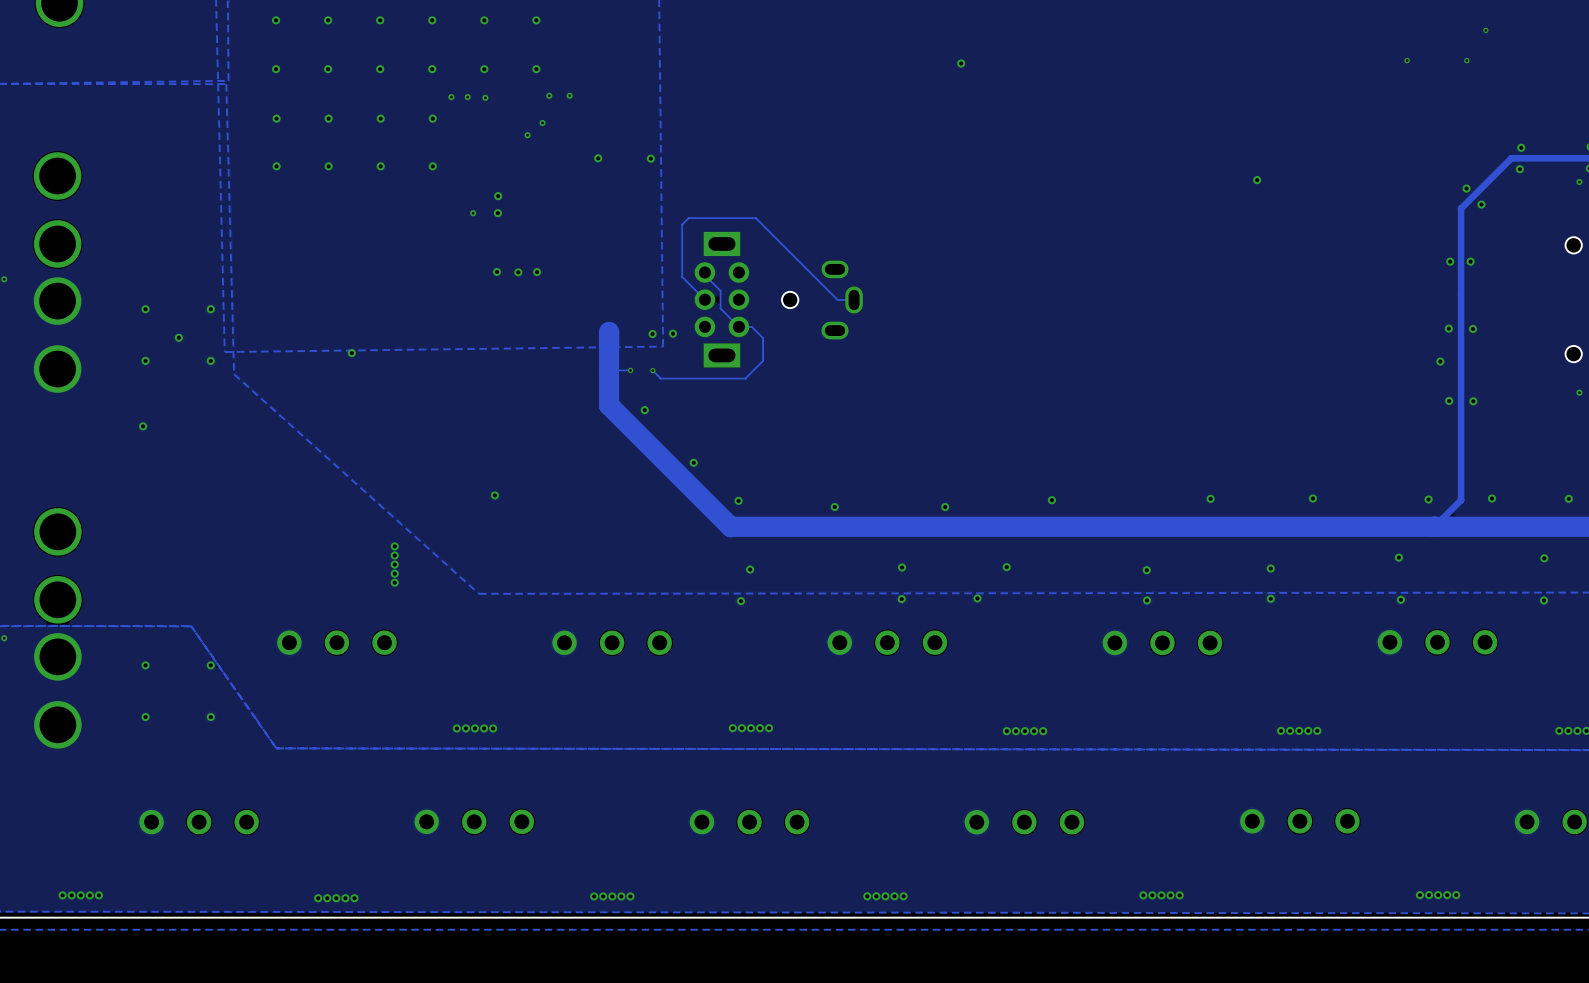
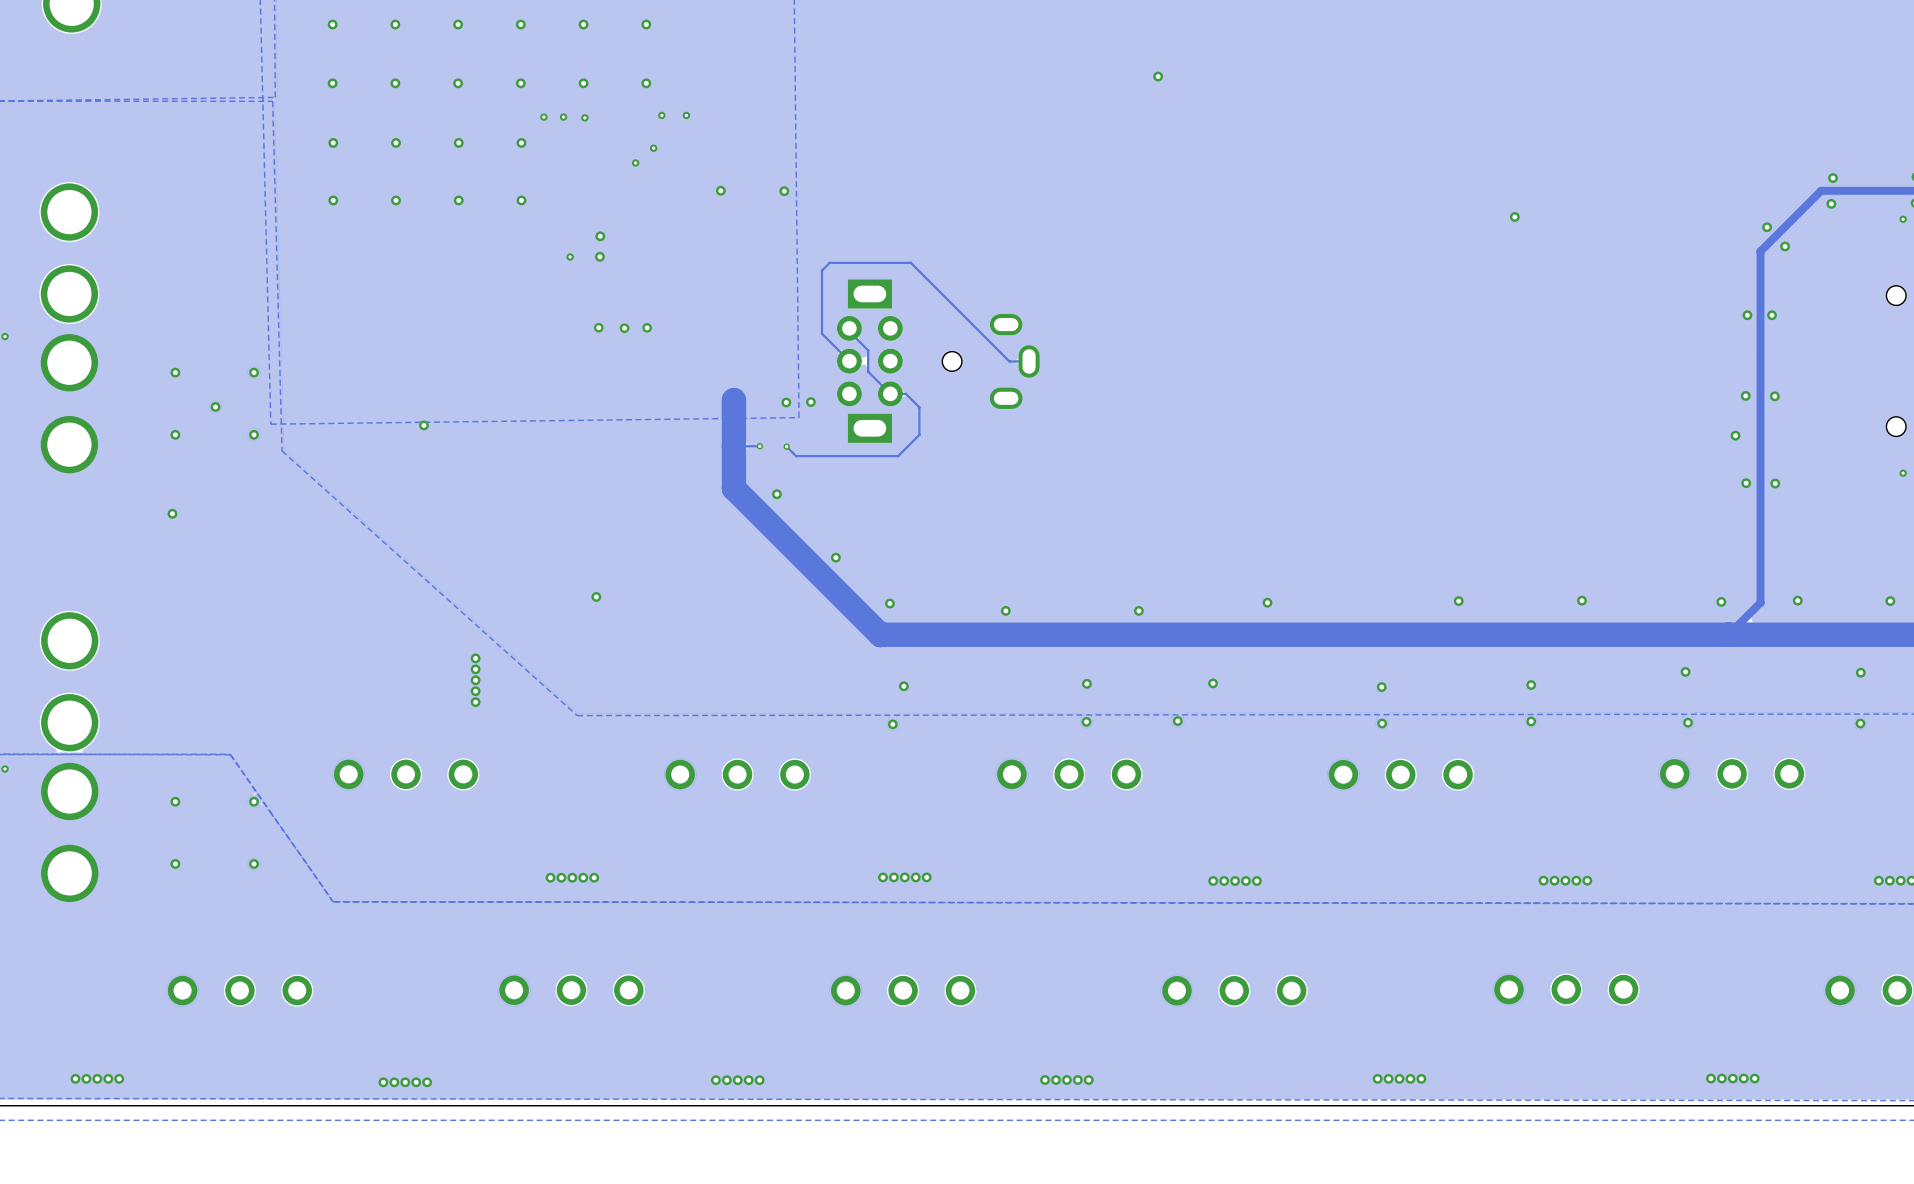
via: (1485, 30) -> none
via: (1407, 60) -> none
via: (1466, 60) -> none

